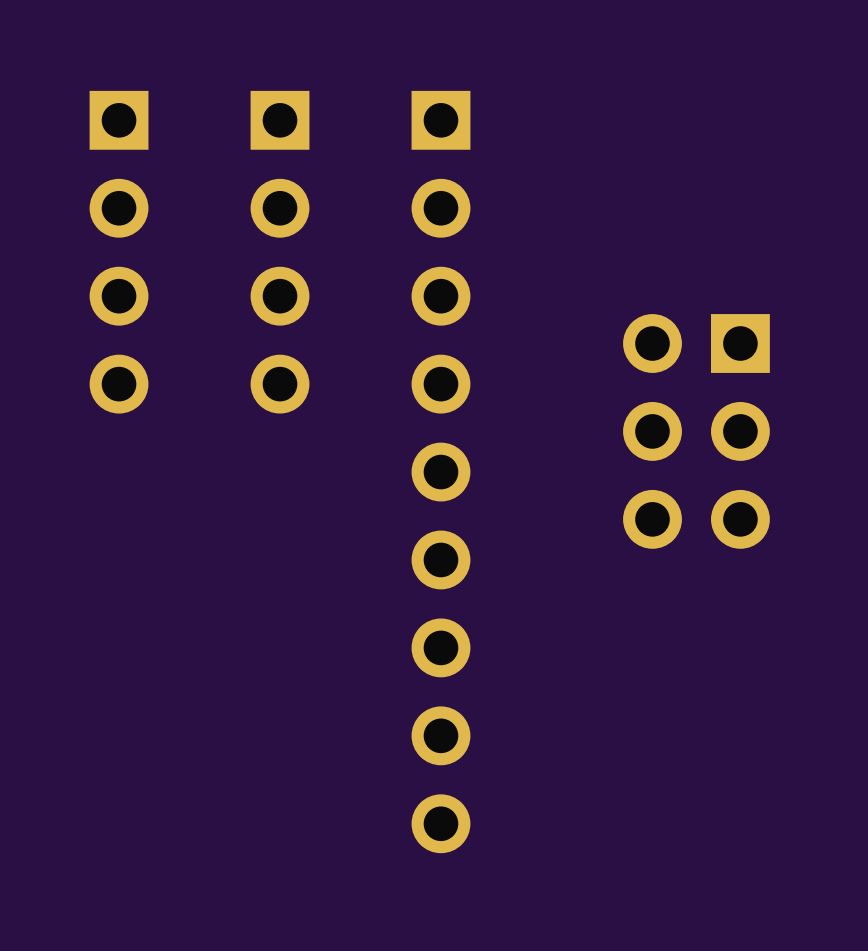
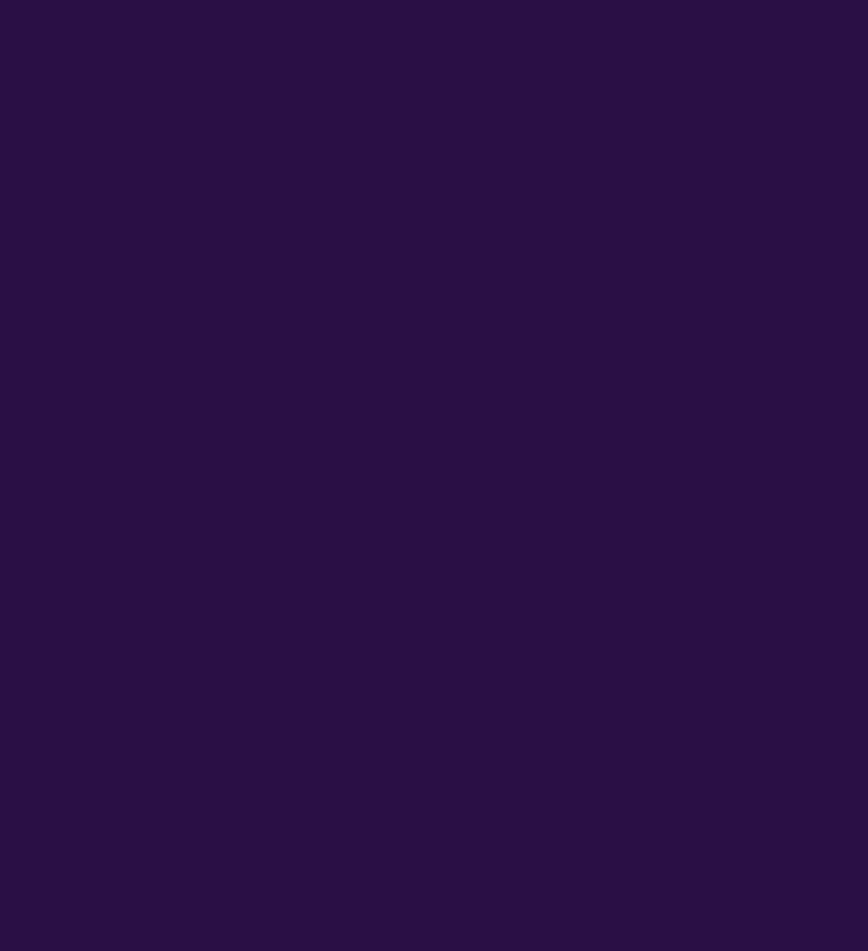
part: (119, 252) -> none
part: (280, 252) -> none
part: (696, 431) -> none
part: (440, 472) -> none

